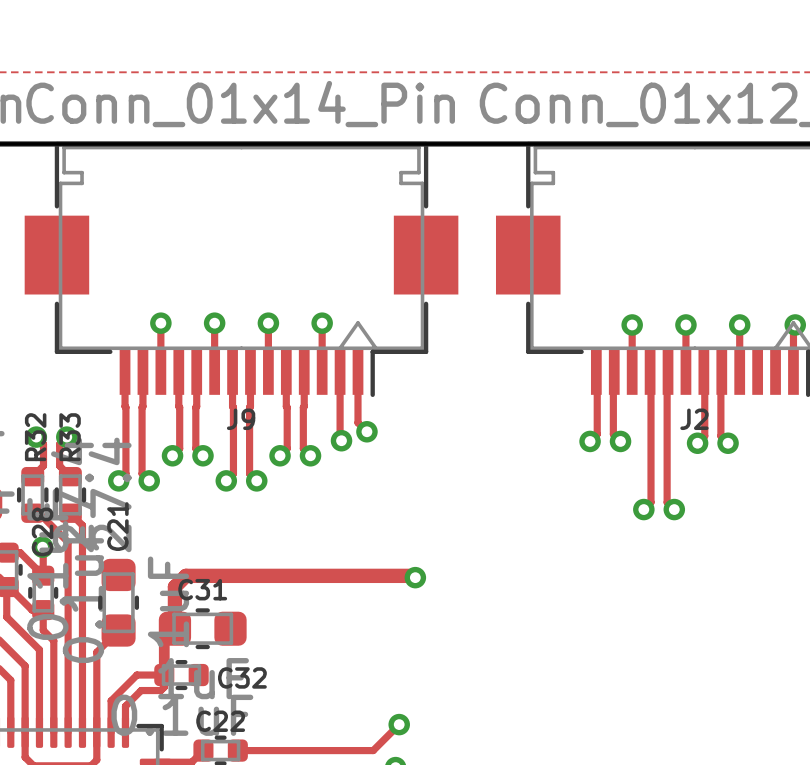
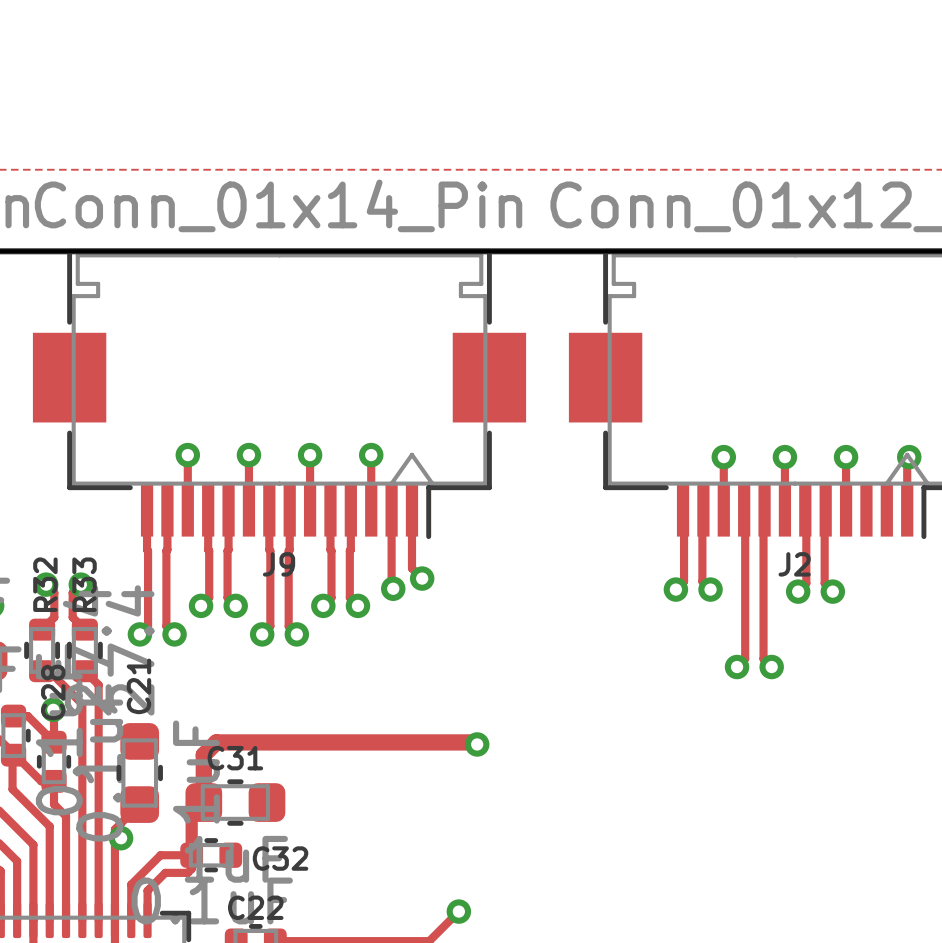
via: none -> (121, 838)

